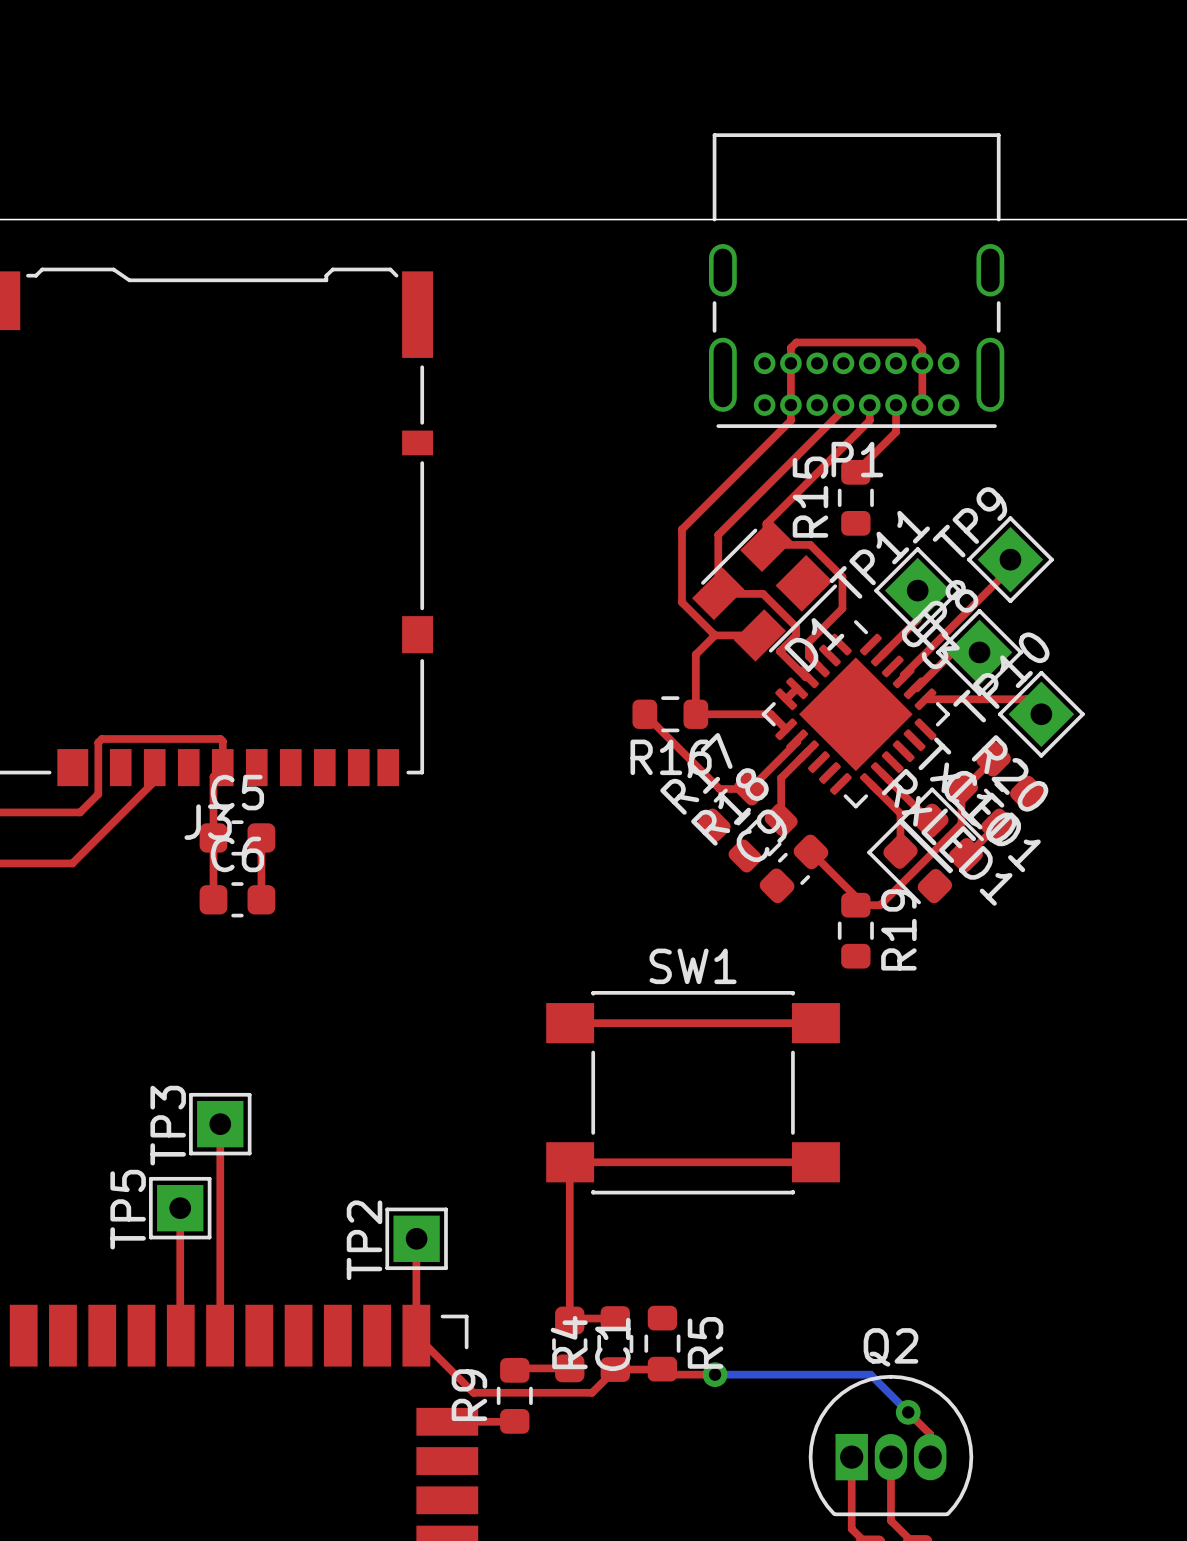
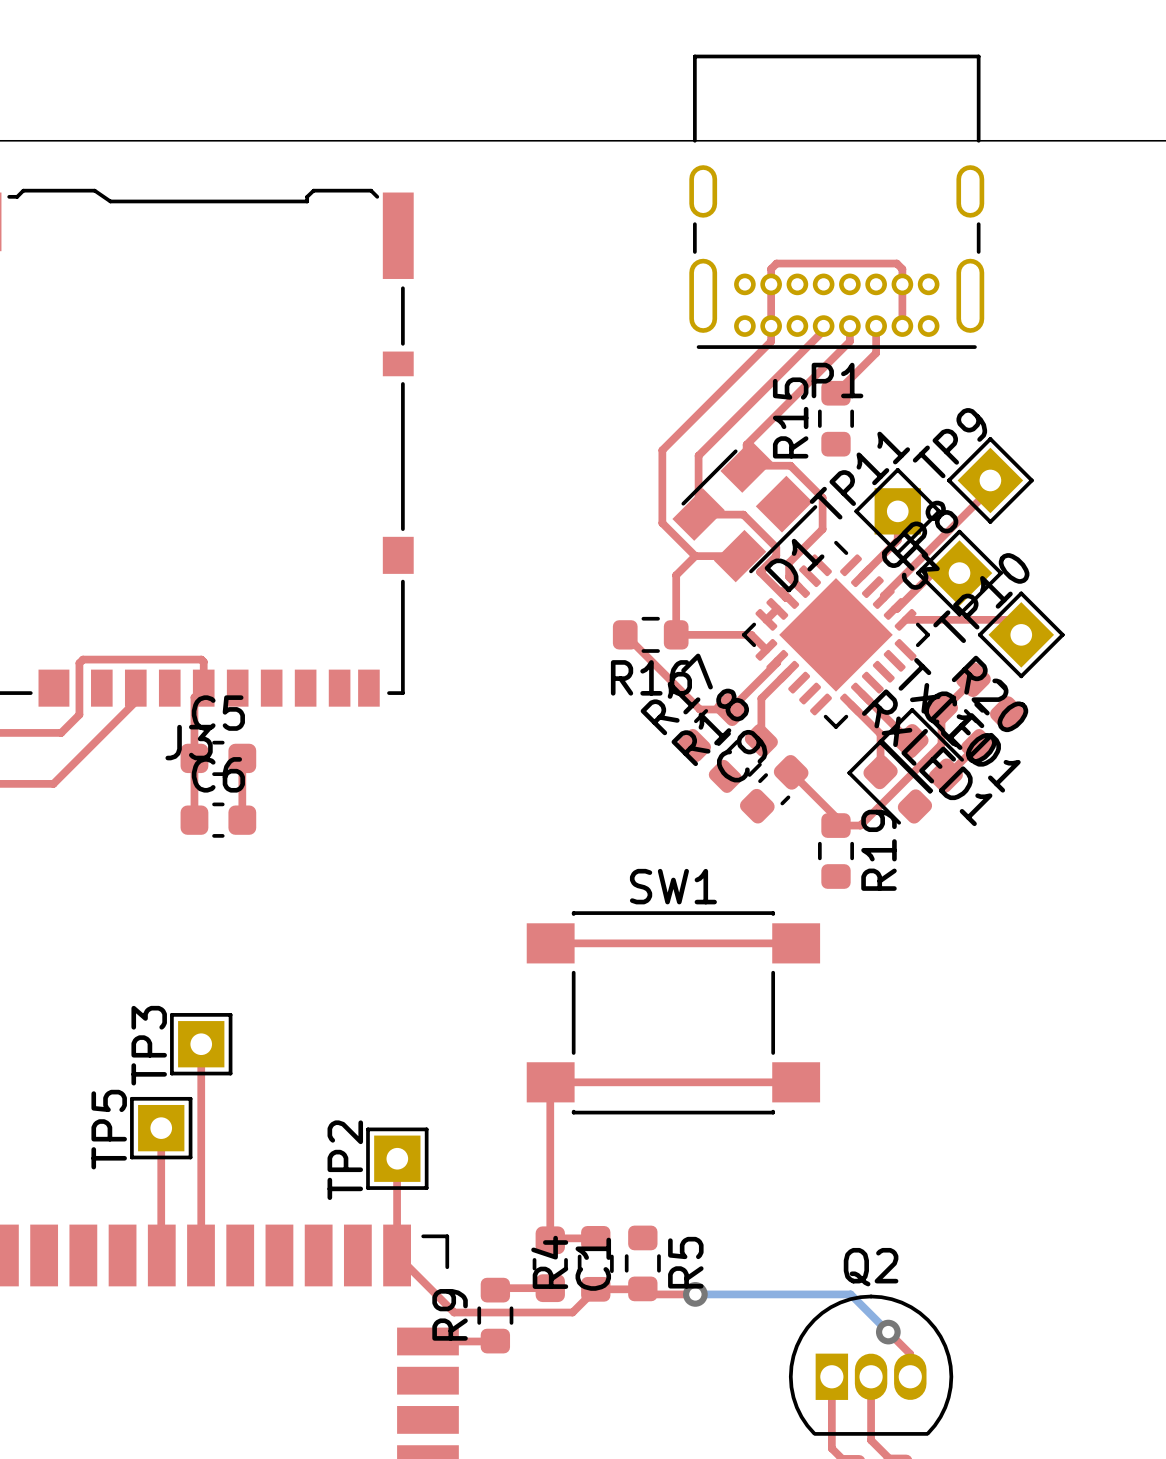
TP11 footprint: [874, 547, 962, 634] -> [854, 468, 942, 555]

